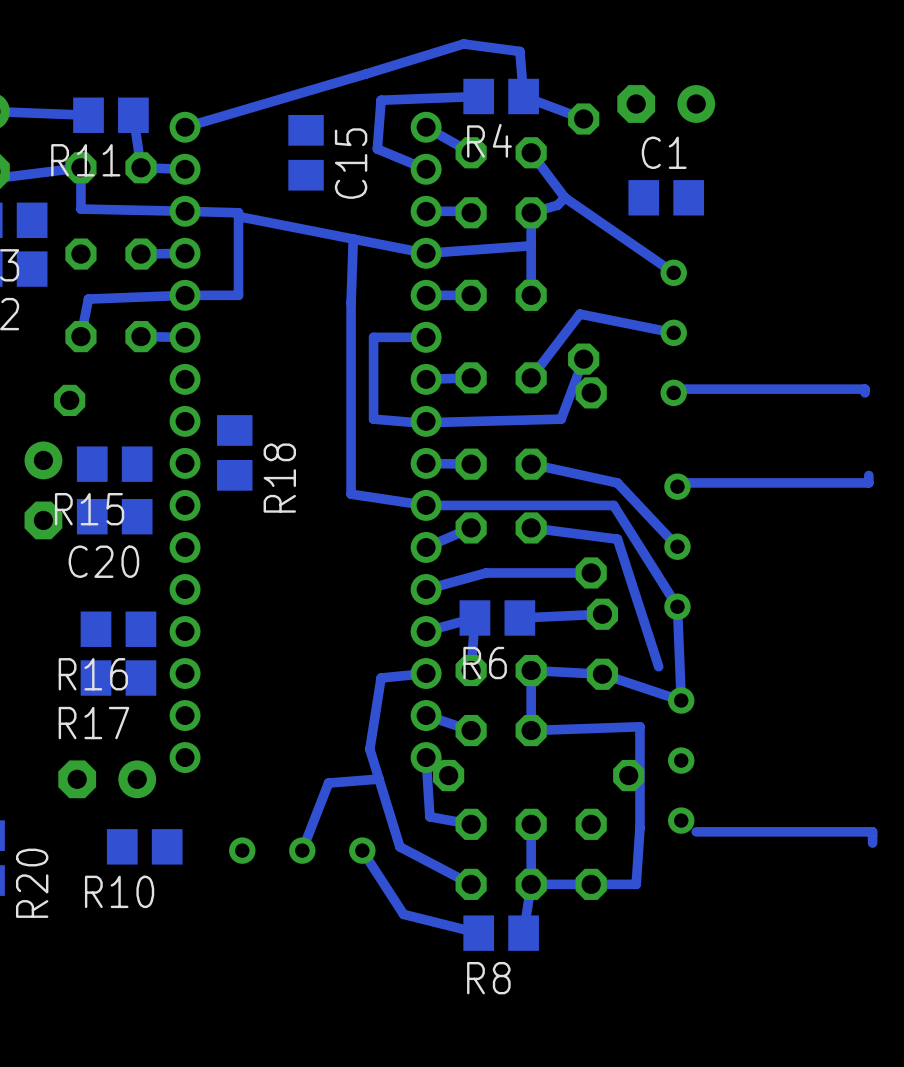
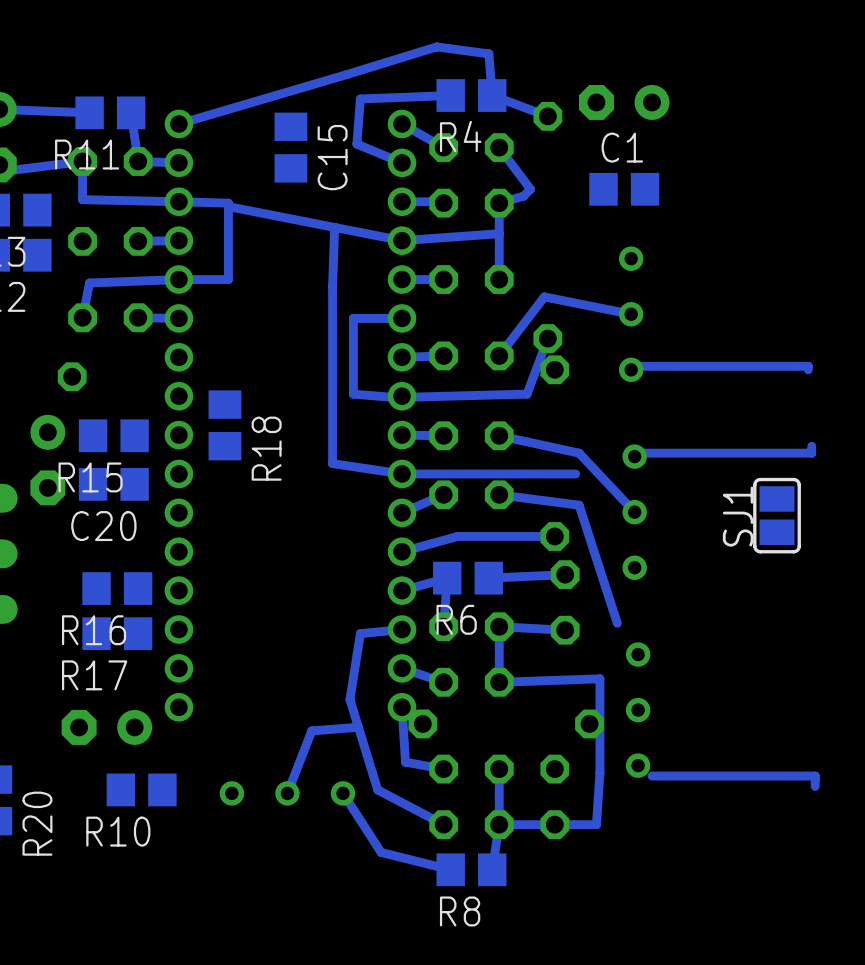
bottom track: (564, 197) (673, 272) -> none
bottom track: (613, 505) (677, 606) (681, 700) (602, 674) -> none
SJ1: none -> (777, 515)

